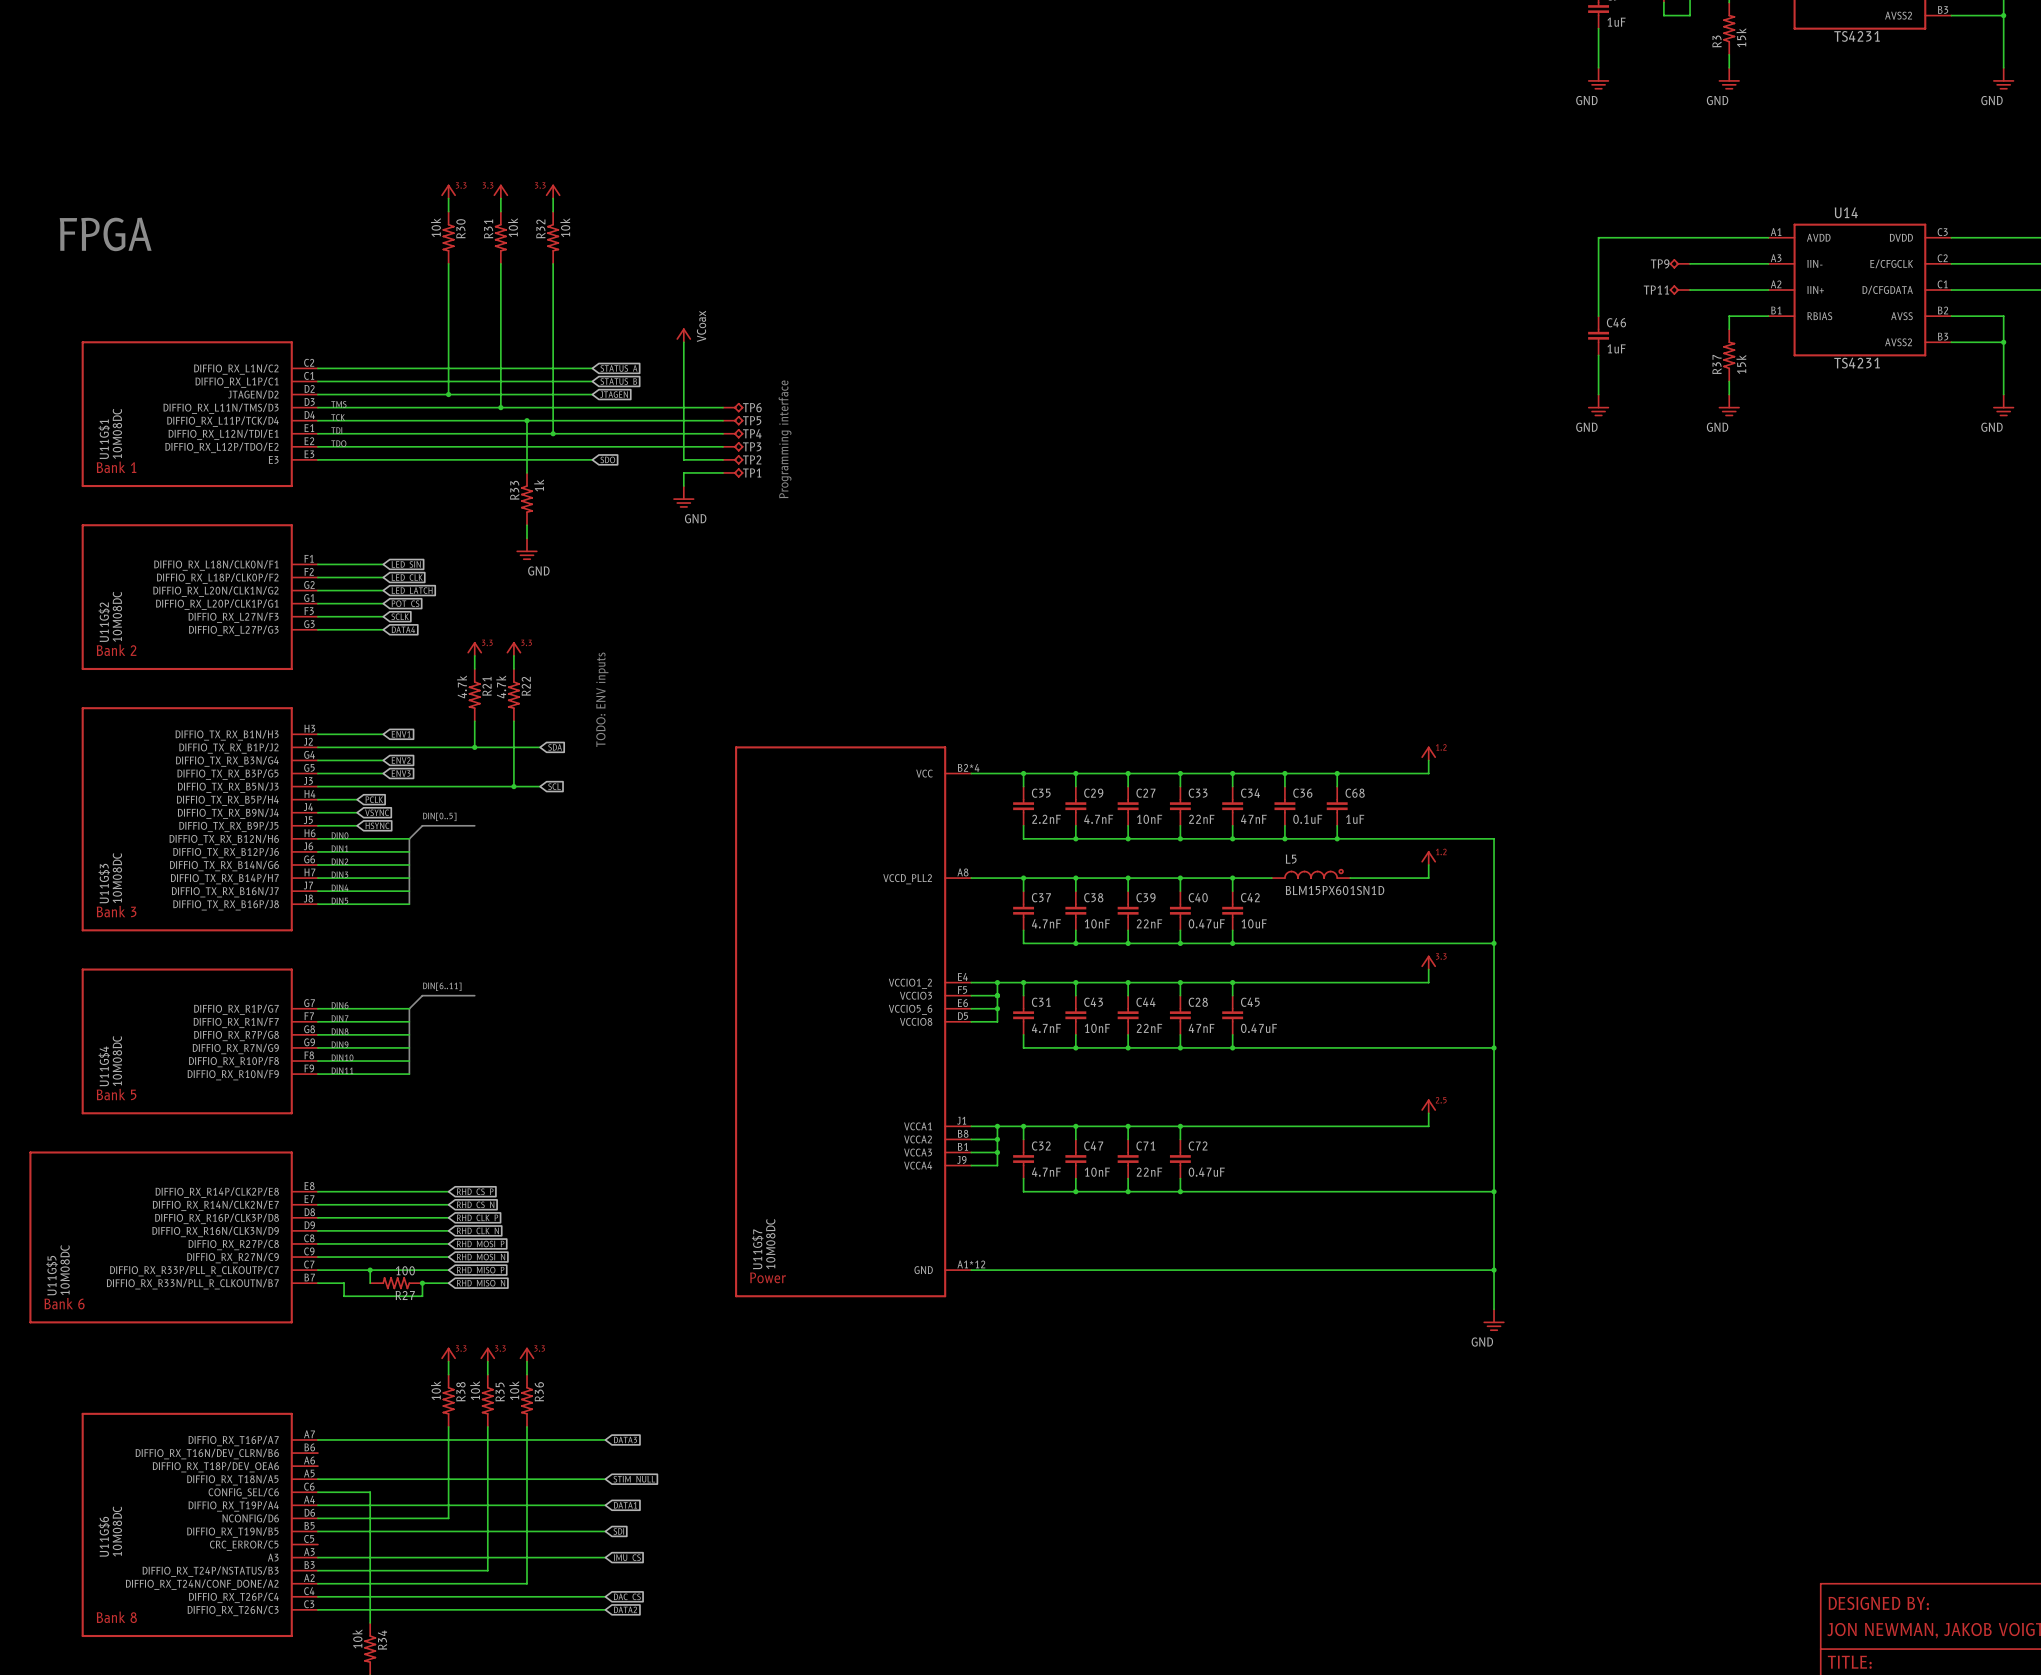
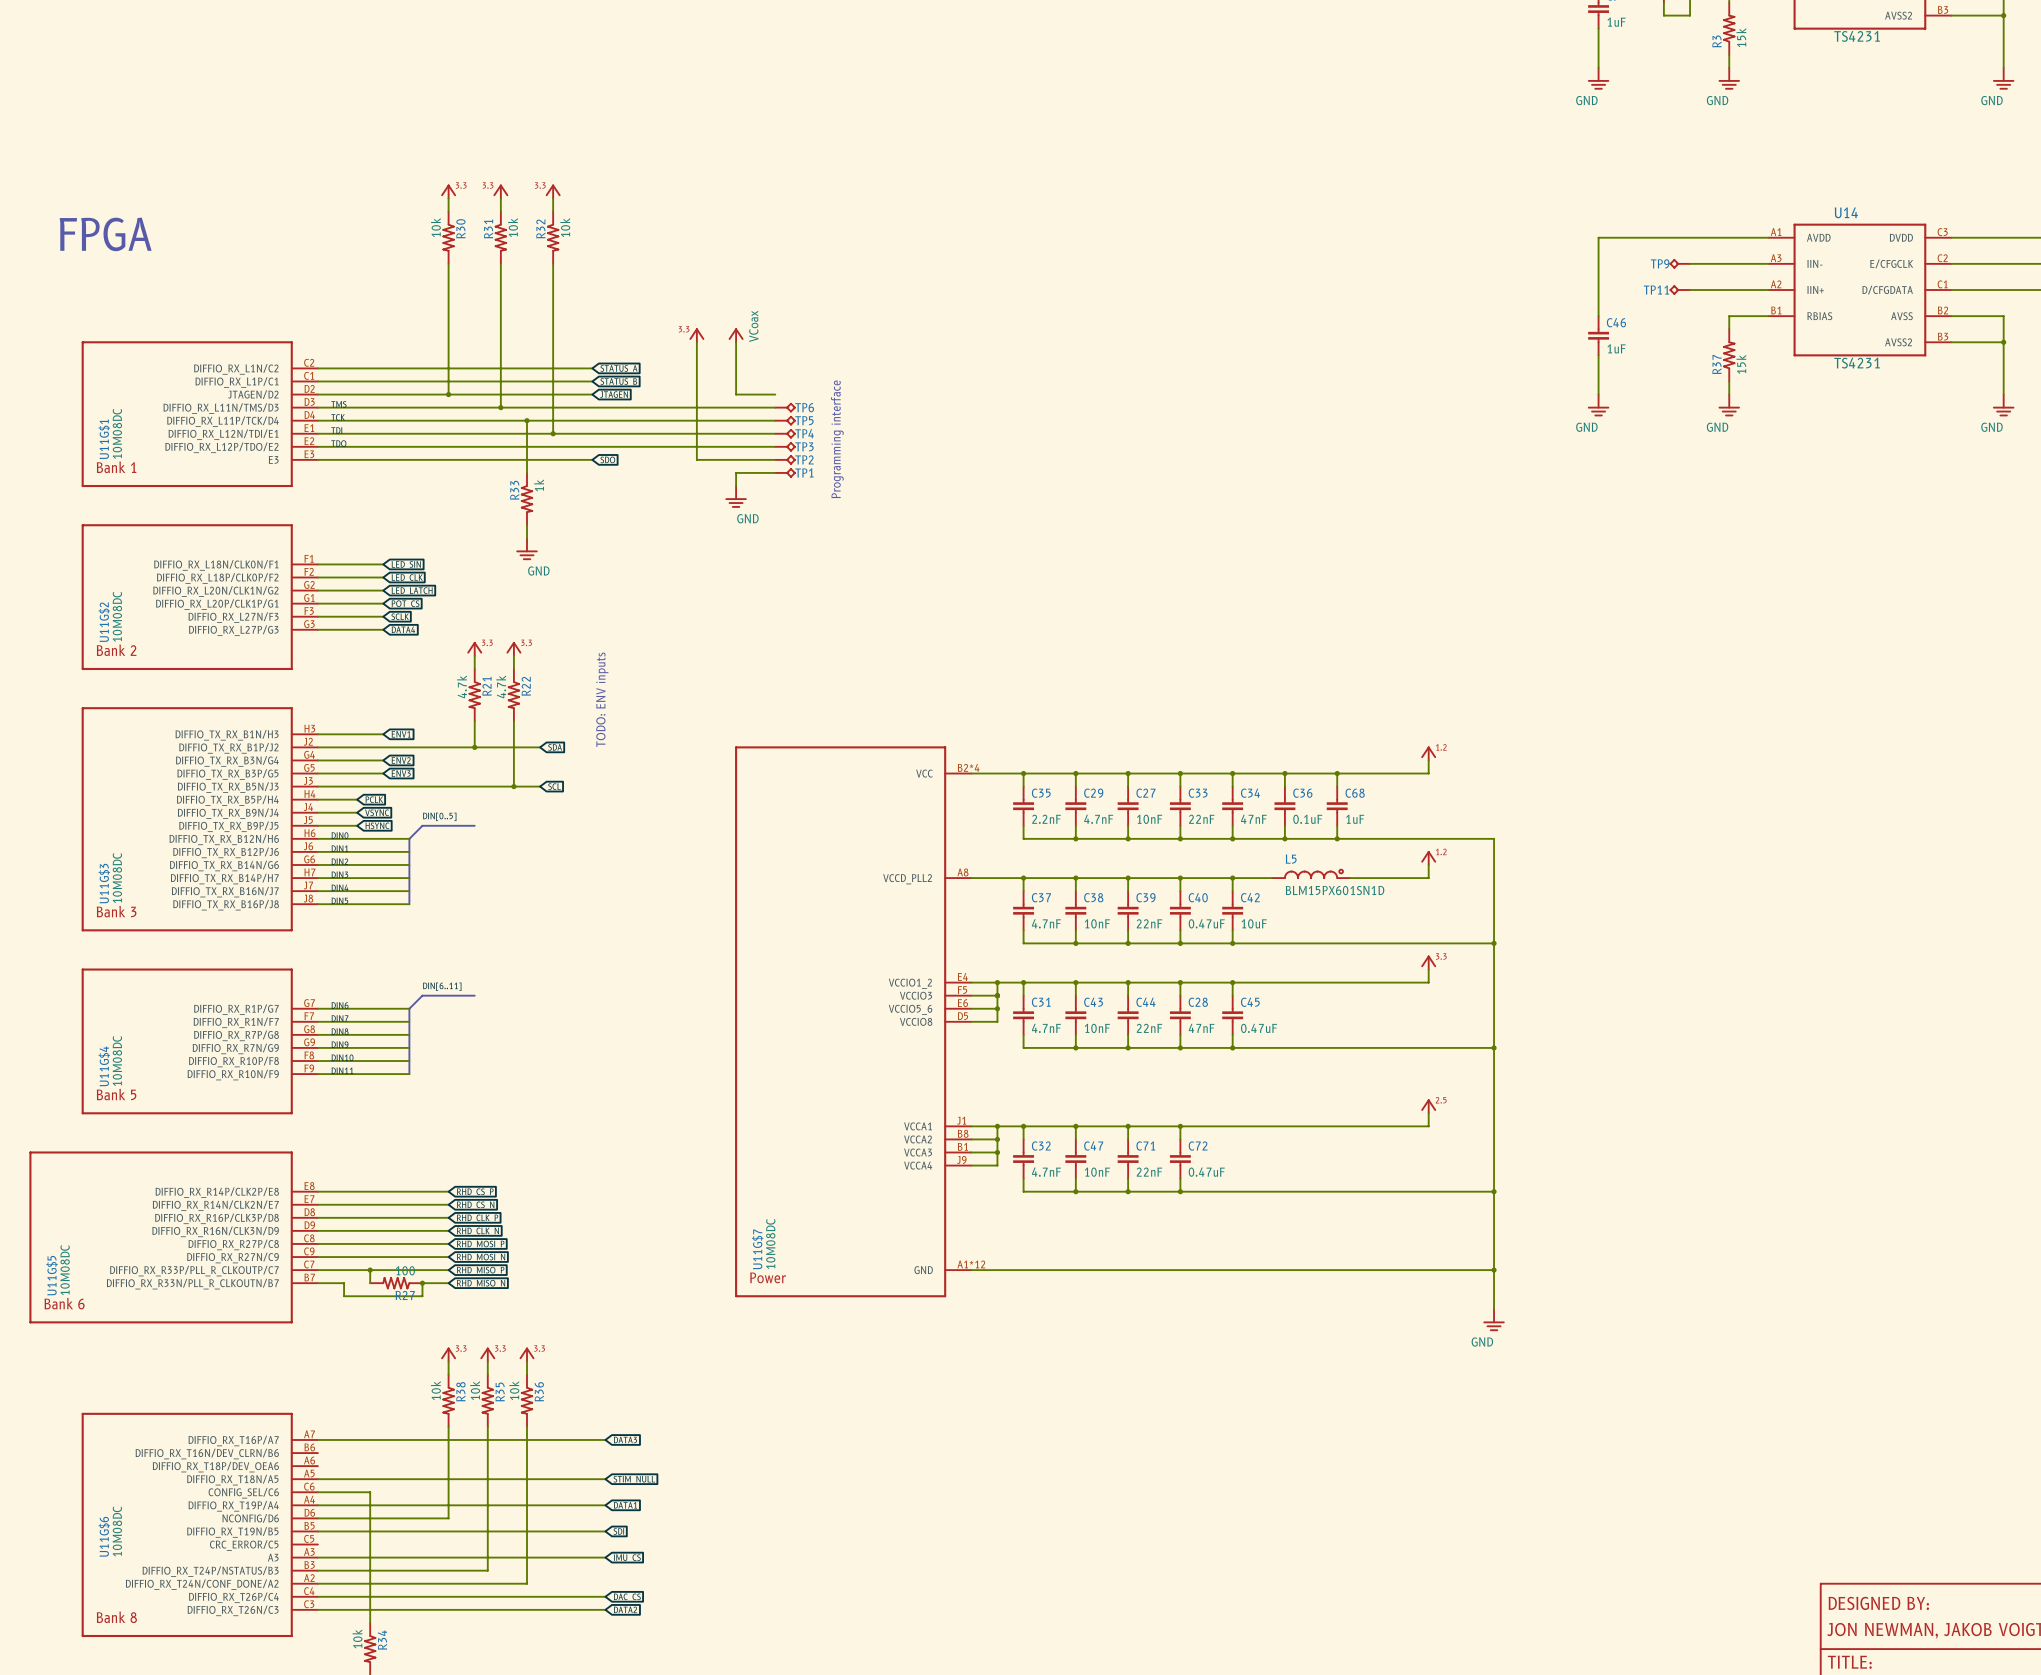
power symbol position: VCoax (683, 335) -> VCoax (736, 335)
power symbol: none -> (696, 335)
wire: (683, 342) (683, 459) (696, 459) -> (696, 342) (696, 459)
wire: none -> (736, 342) (736, 394) (775, 394)
wire: none -> (723, 407) (775, 407)
TP6 position: (733, 407) -> (785, 407)
wire: none -> (723, 420) (775, 420)
TP5 position: (733, 420) -> (785, 420)
wire: none -> (723, 433) (775, 433)
TP4 position: (733, 433) -> (785, 433)
text position: Programming interface (785, 439) -> Programming interface (837, 439)
wire: none -> (723, 446) (775, 446)
TP3 position: (733, 446) -> (785, 446)
wire: none -> (723, 459) (775, 459)
TP2 position: (733, 459) -> (785, 459)
wire: (723, 472) (683, 472) (683, 486) -> (775, 472) (736, 472) (736, 486)
TP1 position: (733, 472) -> (785, 472)
power symbol position: GND (683, 496) -> GND (736, 496)

